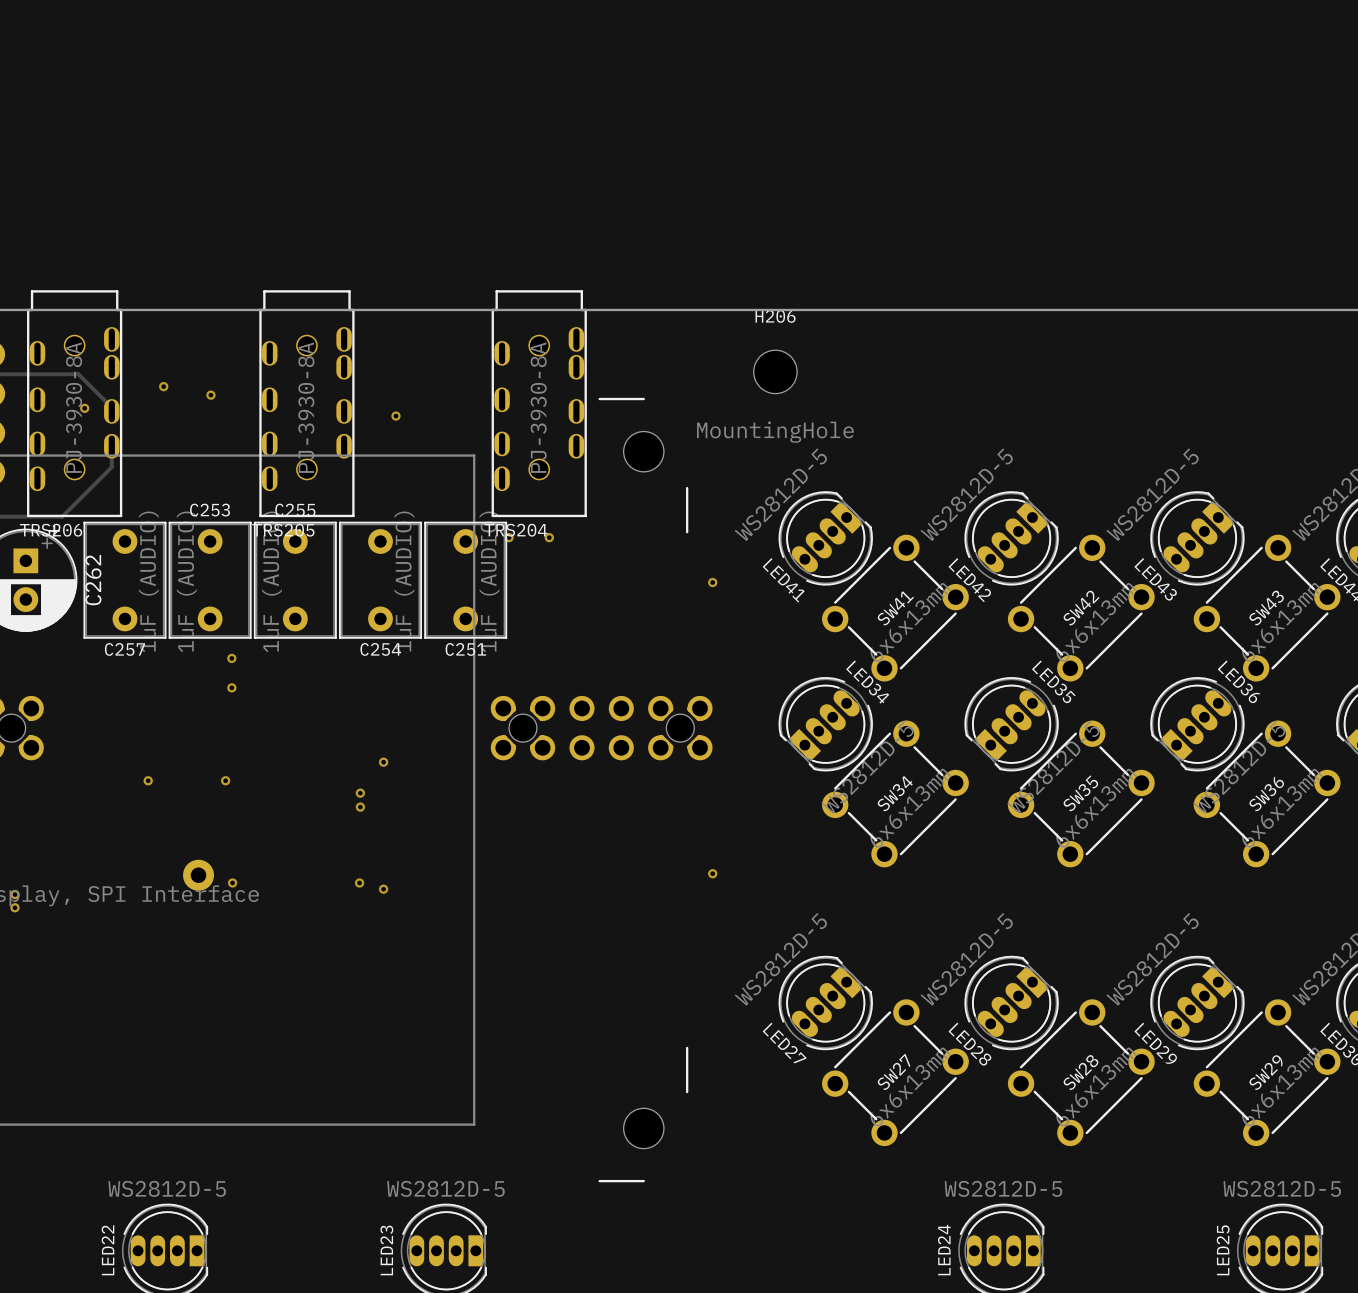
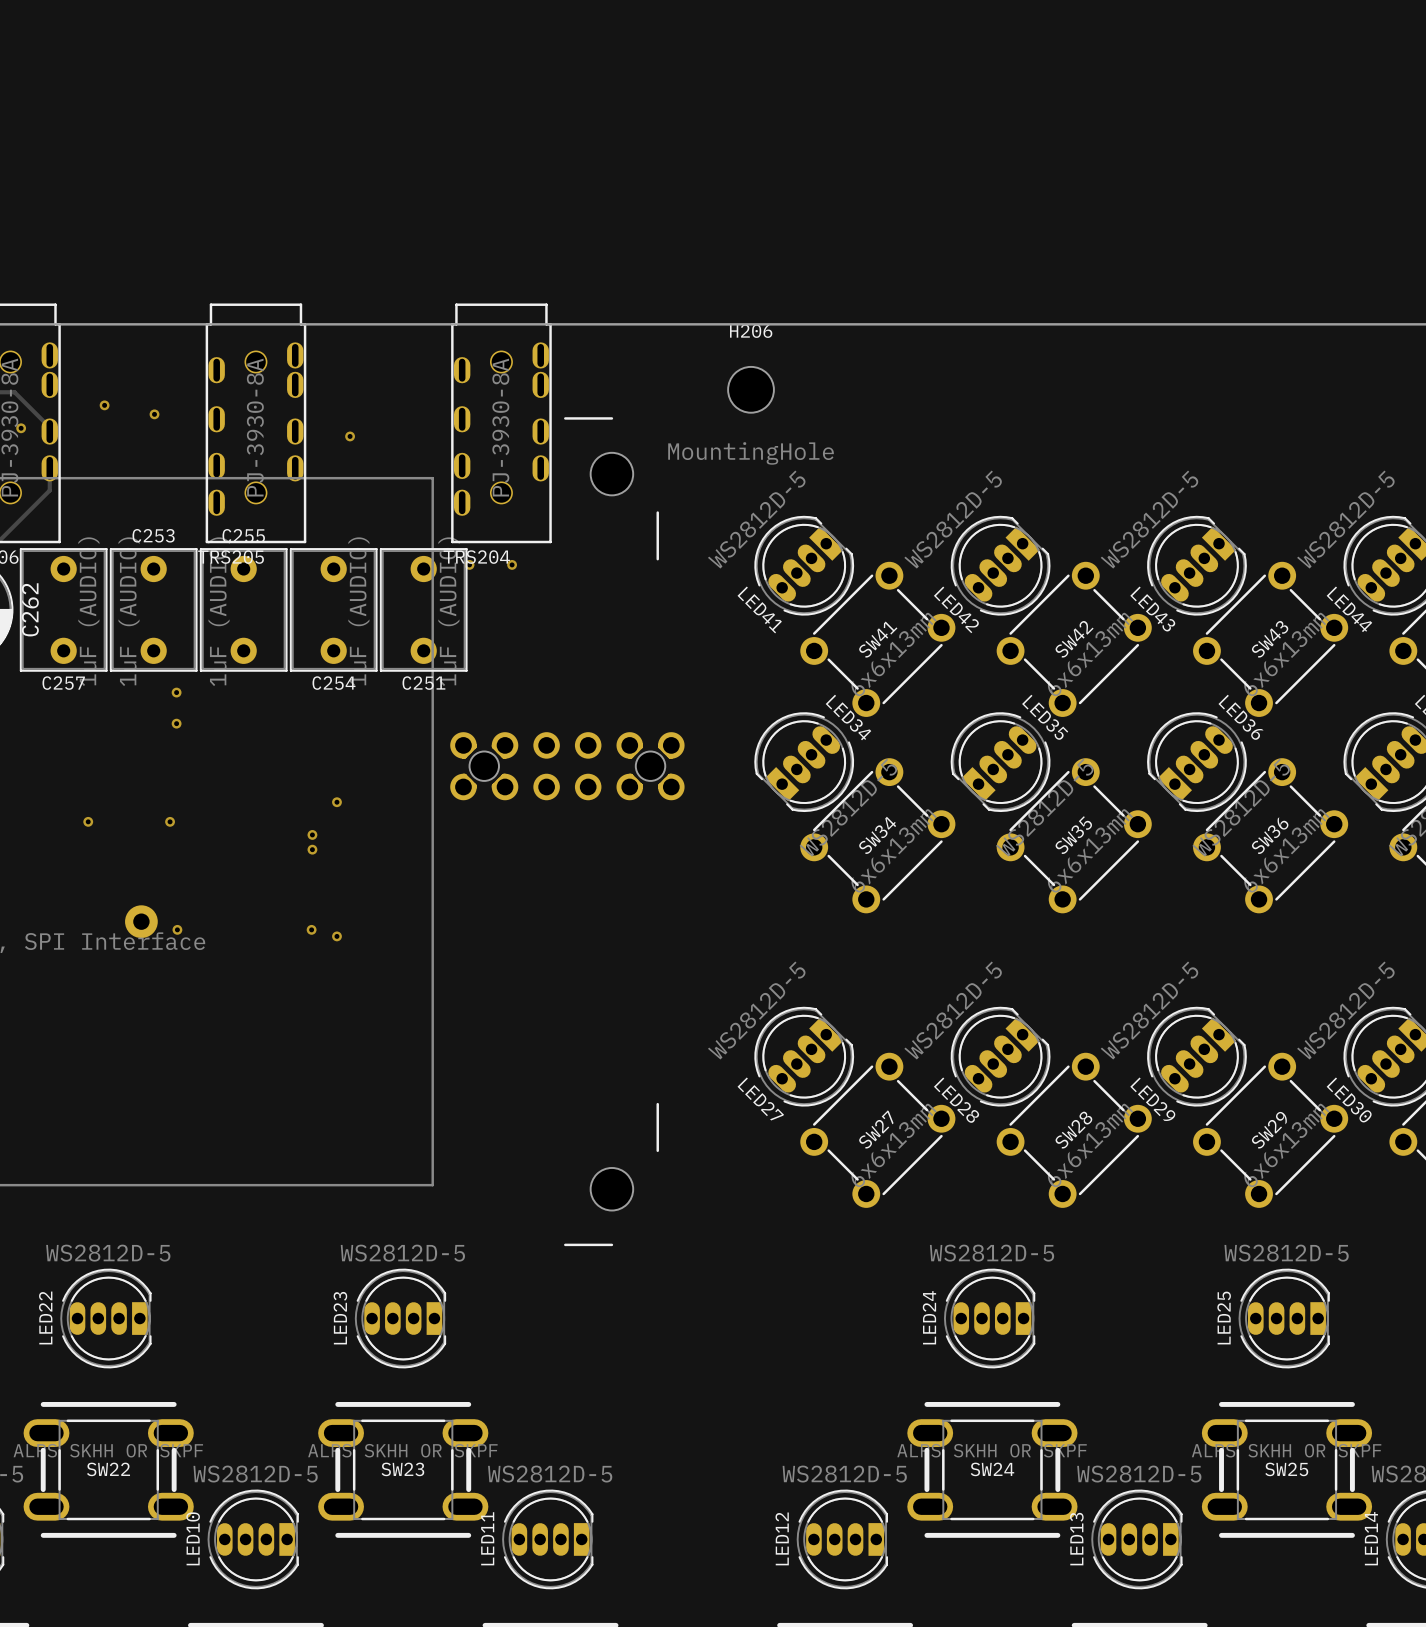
via: (712, 582) -> none
via: (712, 873) -> none

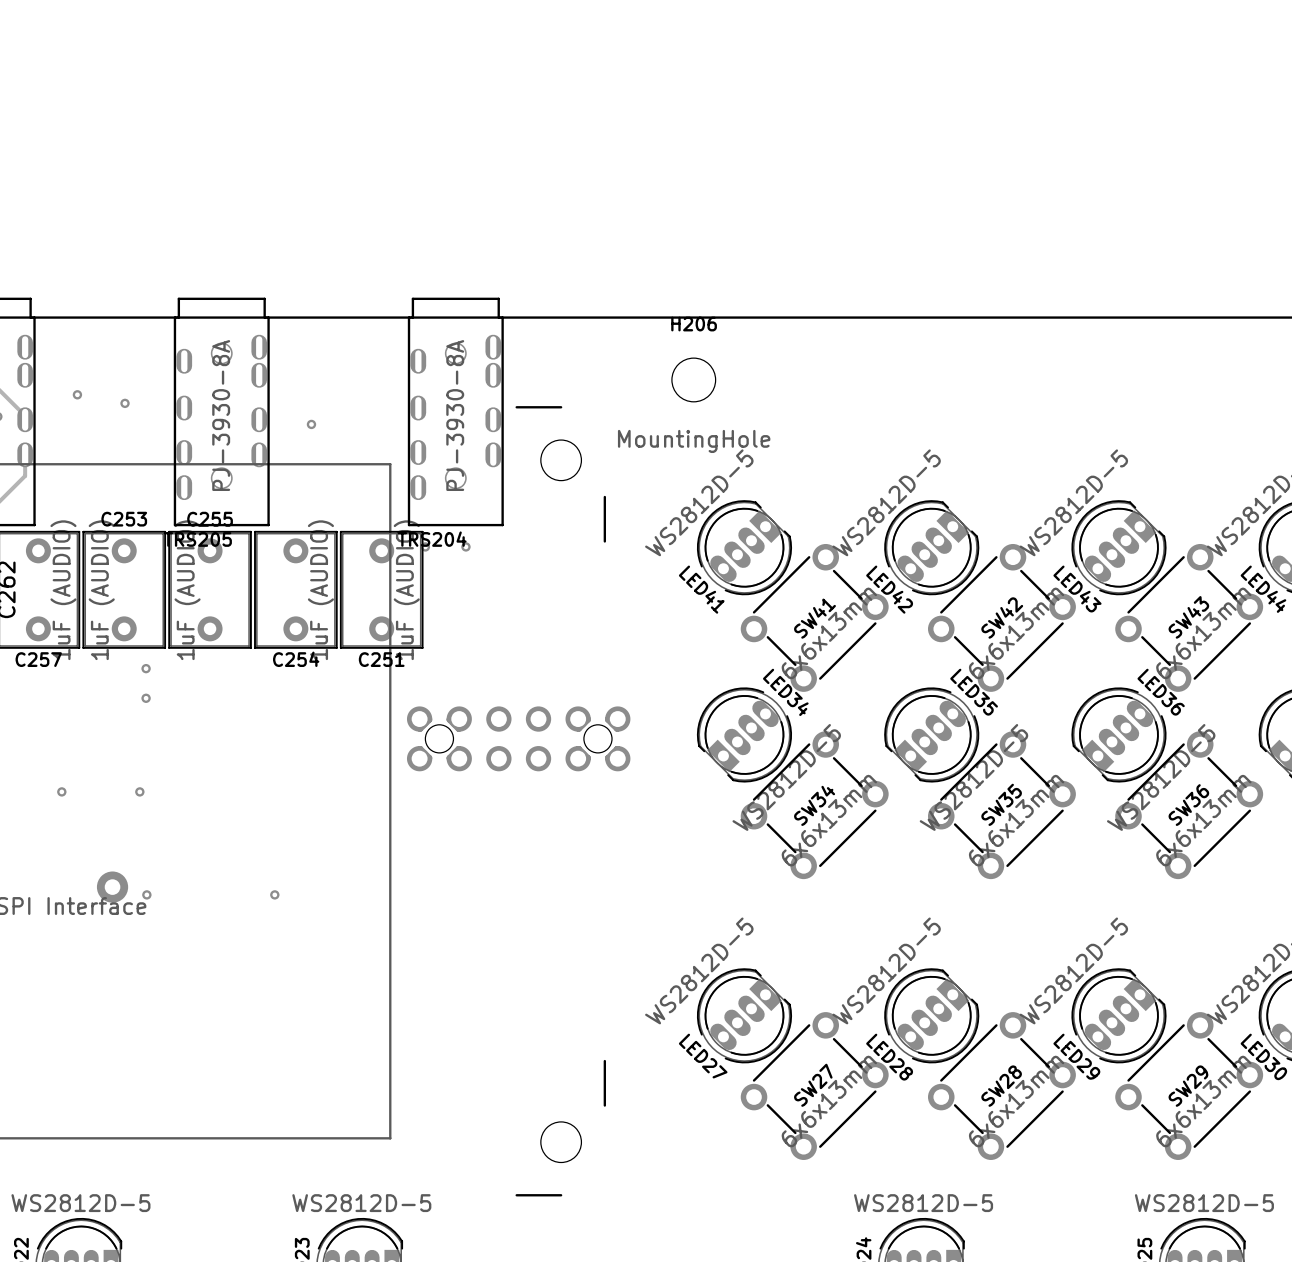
via: (336, 802) -> none
via: (312, 834) -> none
via: (312, 849) -> none
via: (336, 936) -> none

